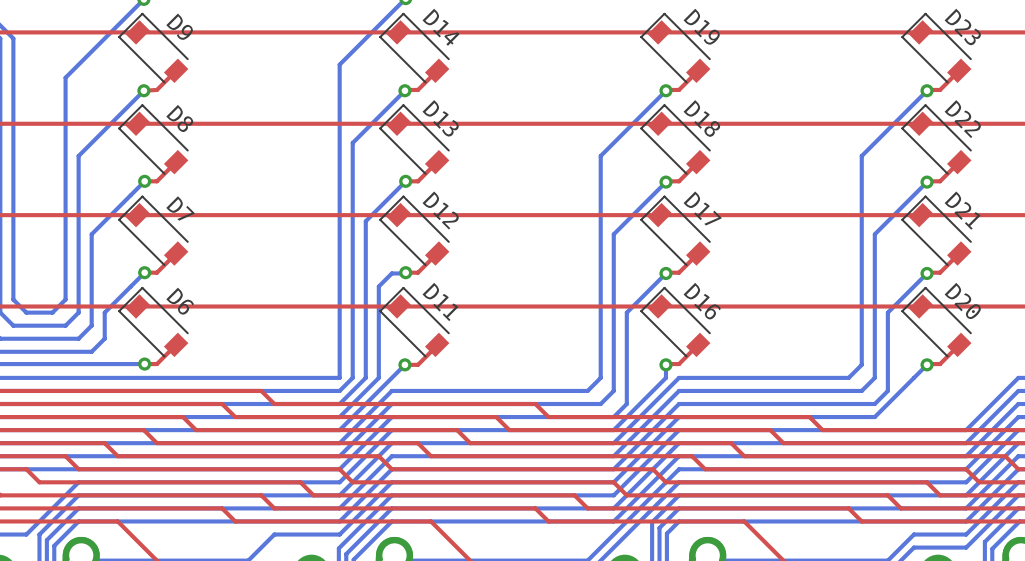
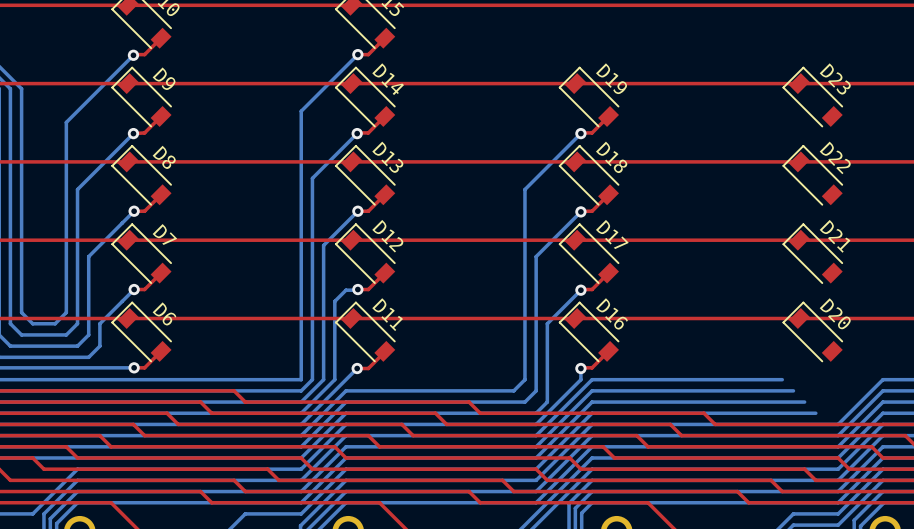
top track: (959, 70) (940, 89) (927, 90) -> none
bottom track: (927, 90) (861, 156) (861, 364) (848, 377) -> (782, 379) (737, 379)
via: (927, 90) -> none
top track: (959, 162) (940, 181) (927, 182) -> none
bottom track: (927, 182) (874, 234) (874, 377) (861, 390) -> (793, 390) (748, 390)
via: (927, 182) -> none
top track: (959, 253) (940, 272) (927, 273) -> none
bottom track: (927, 273) (887, 312) (887, 390) (874, 404) -> (804, 402) (759, 402)
via: (927, 273) -> none
top track: (959, 344) (940, 364) (927, 364) -> none
bottom track: (927, 364) (874, 417) -> (815, 413) (759, 413)
via: (927, 364) -> none

